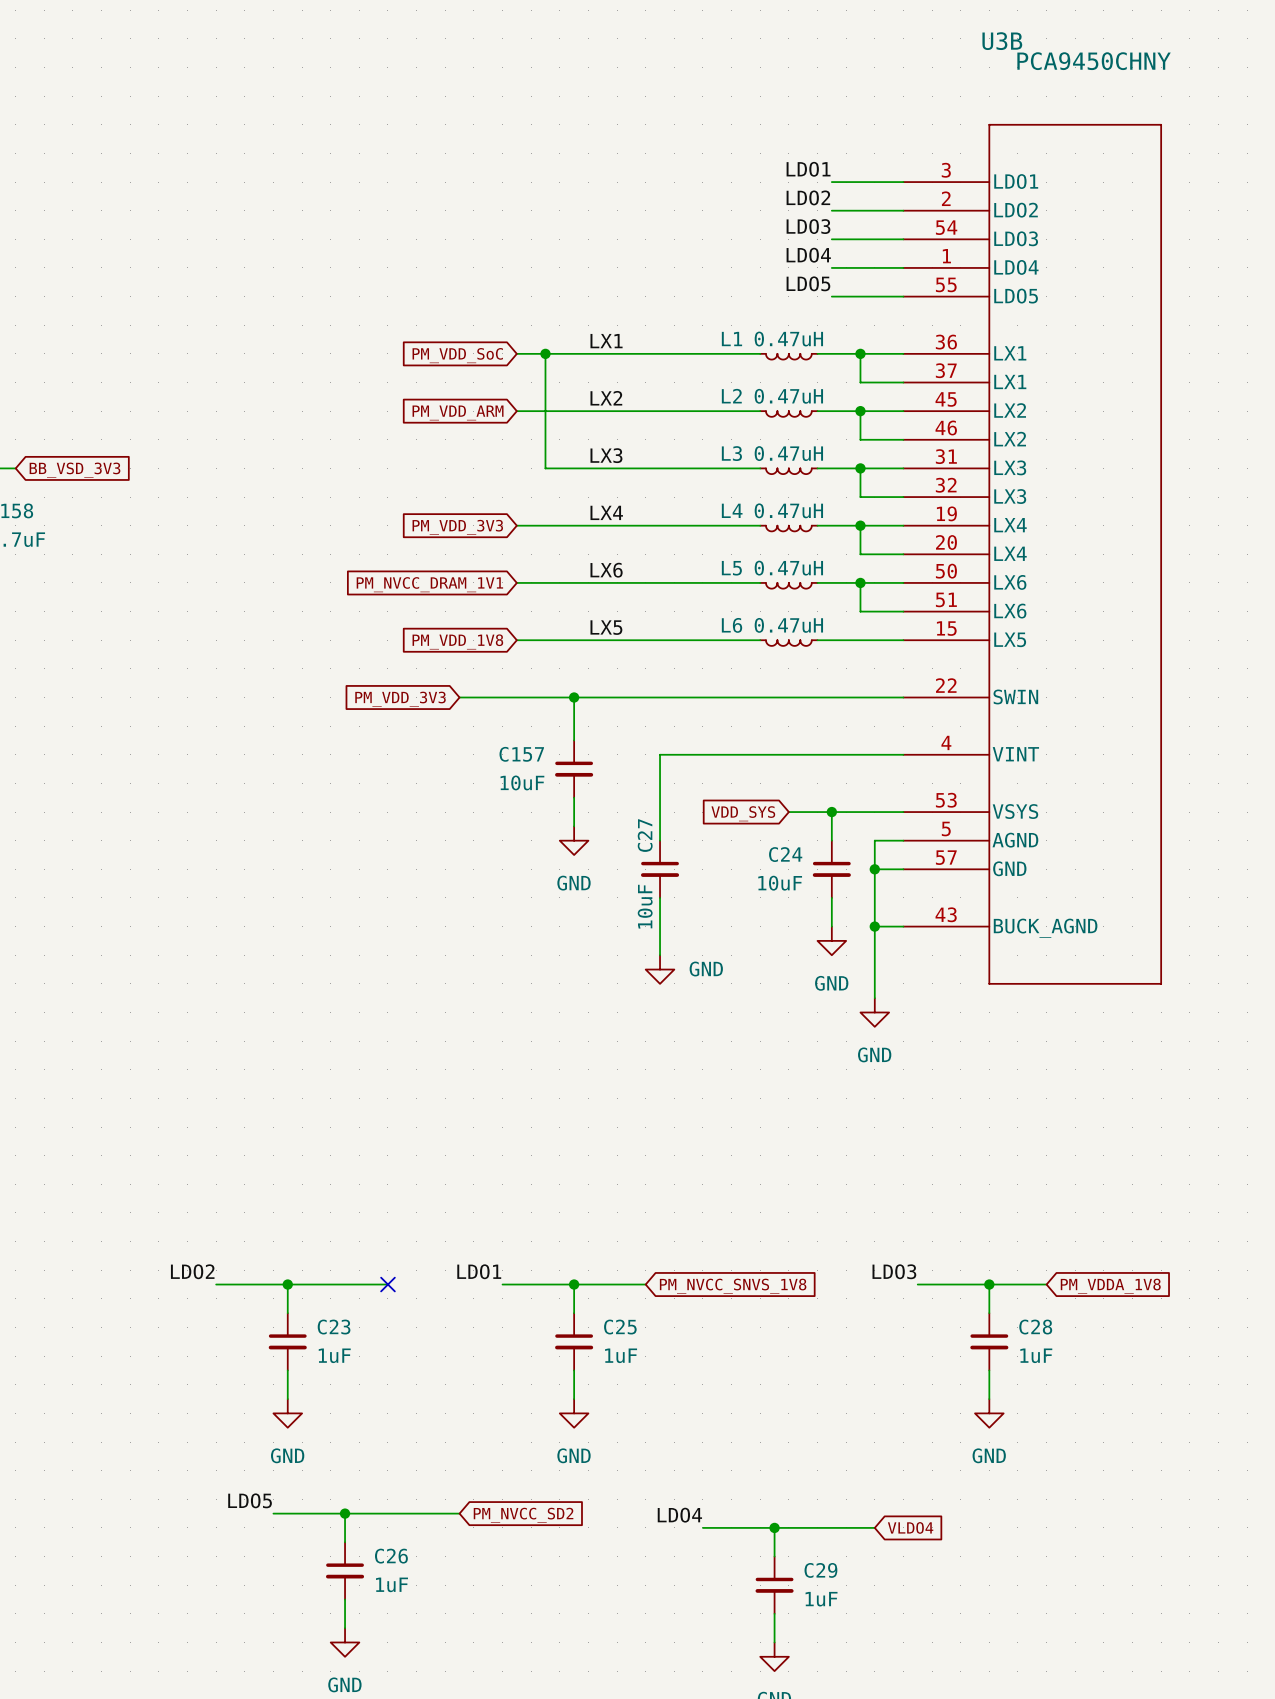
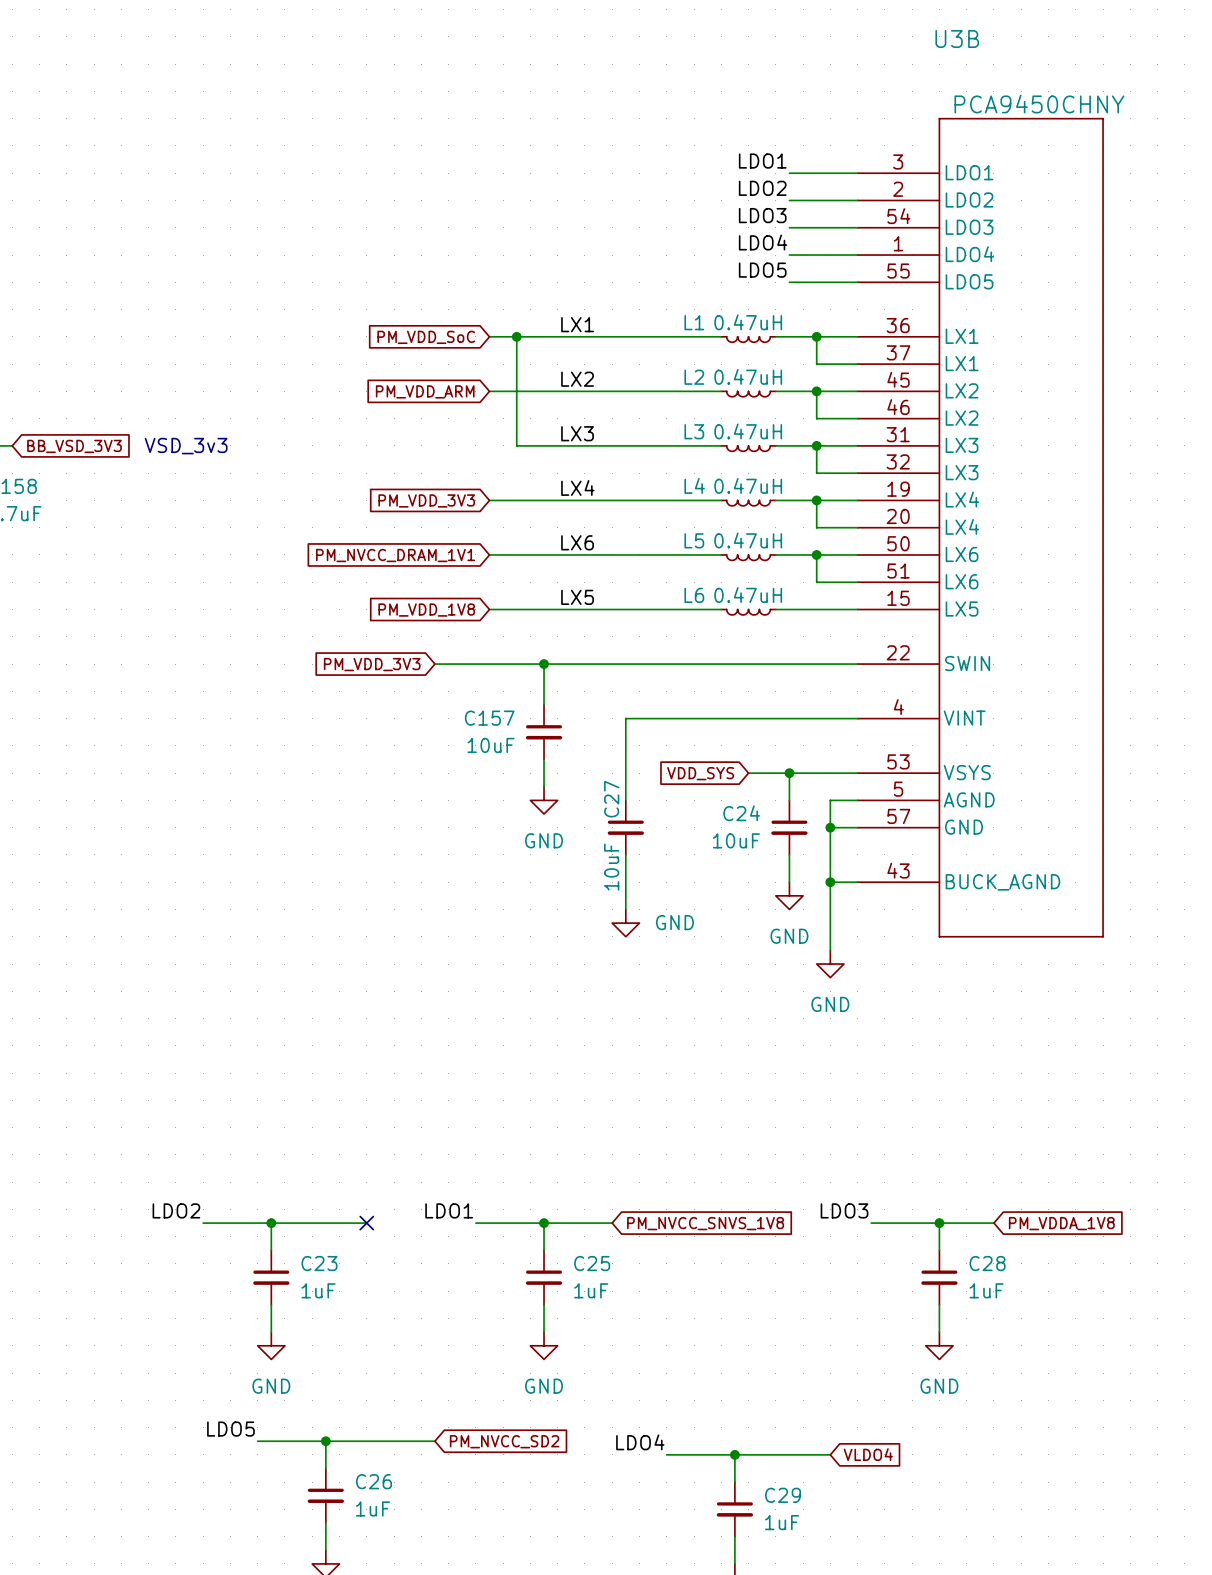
U3B value position: PCA9450CHNY (1094, 61) -> PCA9450CHNY (1039, 104)
text: none -> VSD_3v3 (186, 446)

